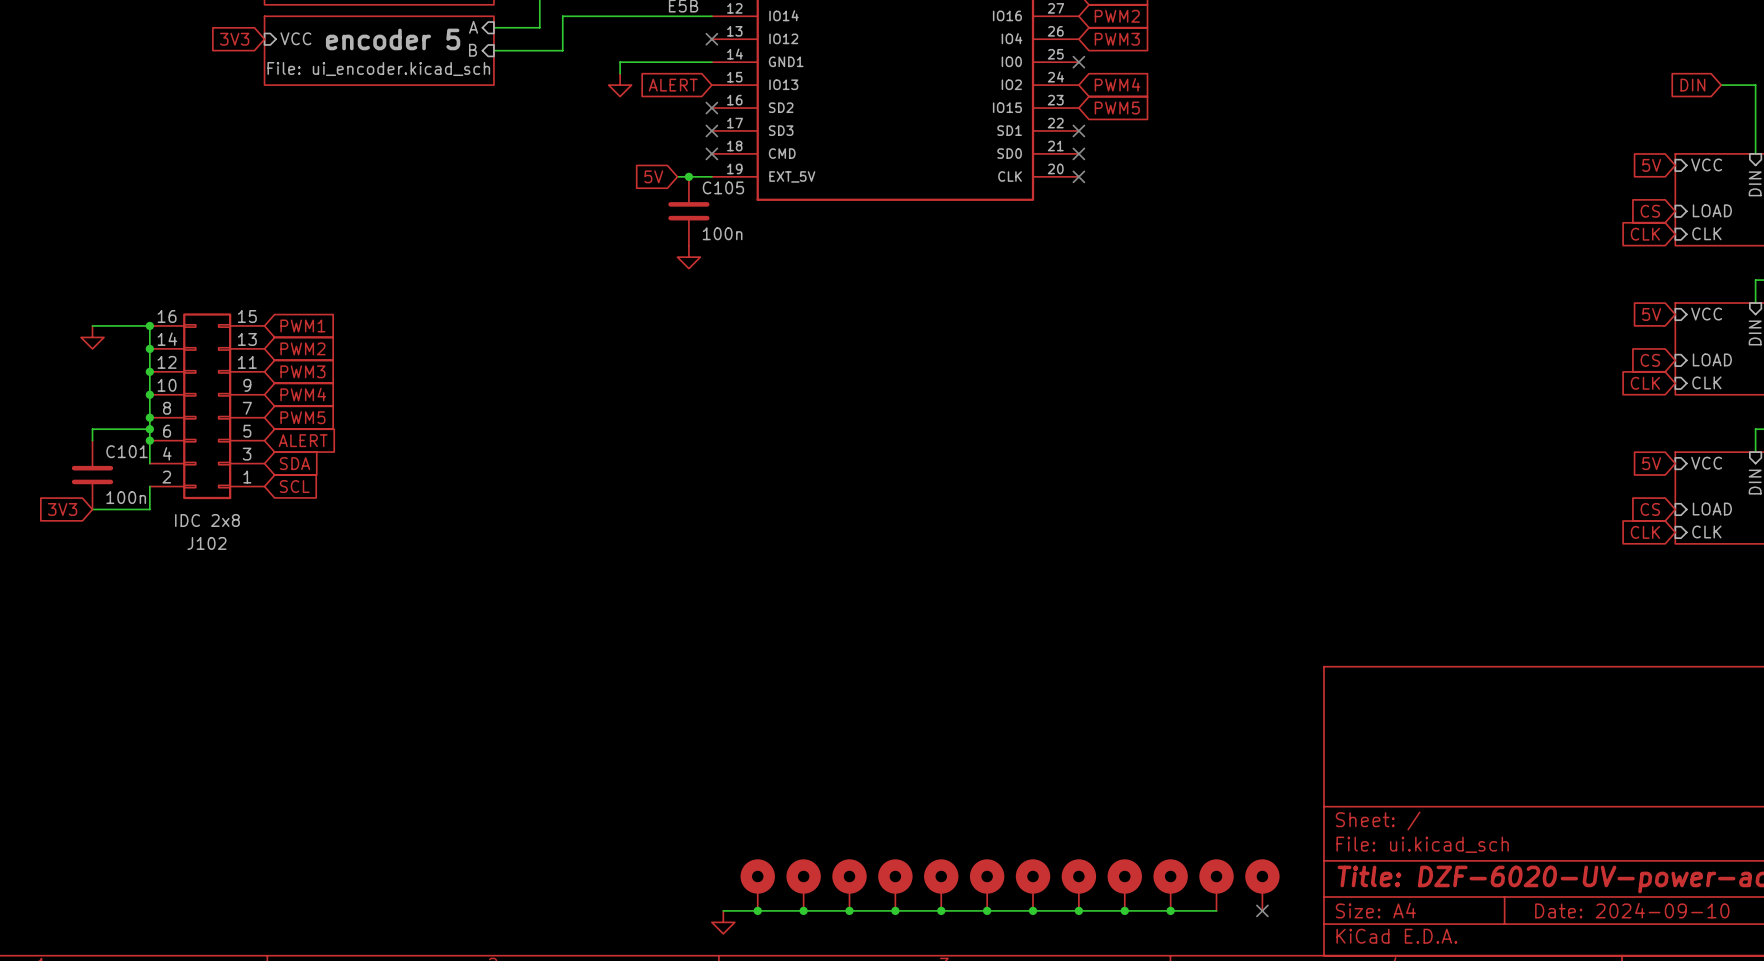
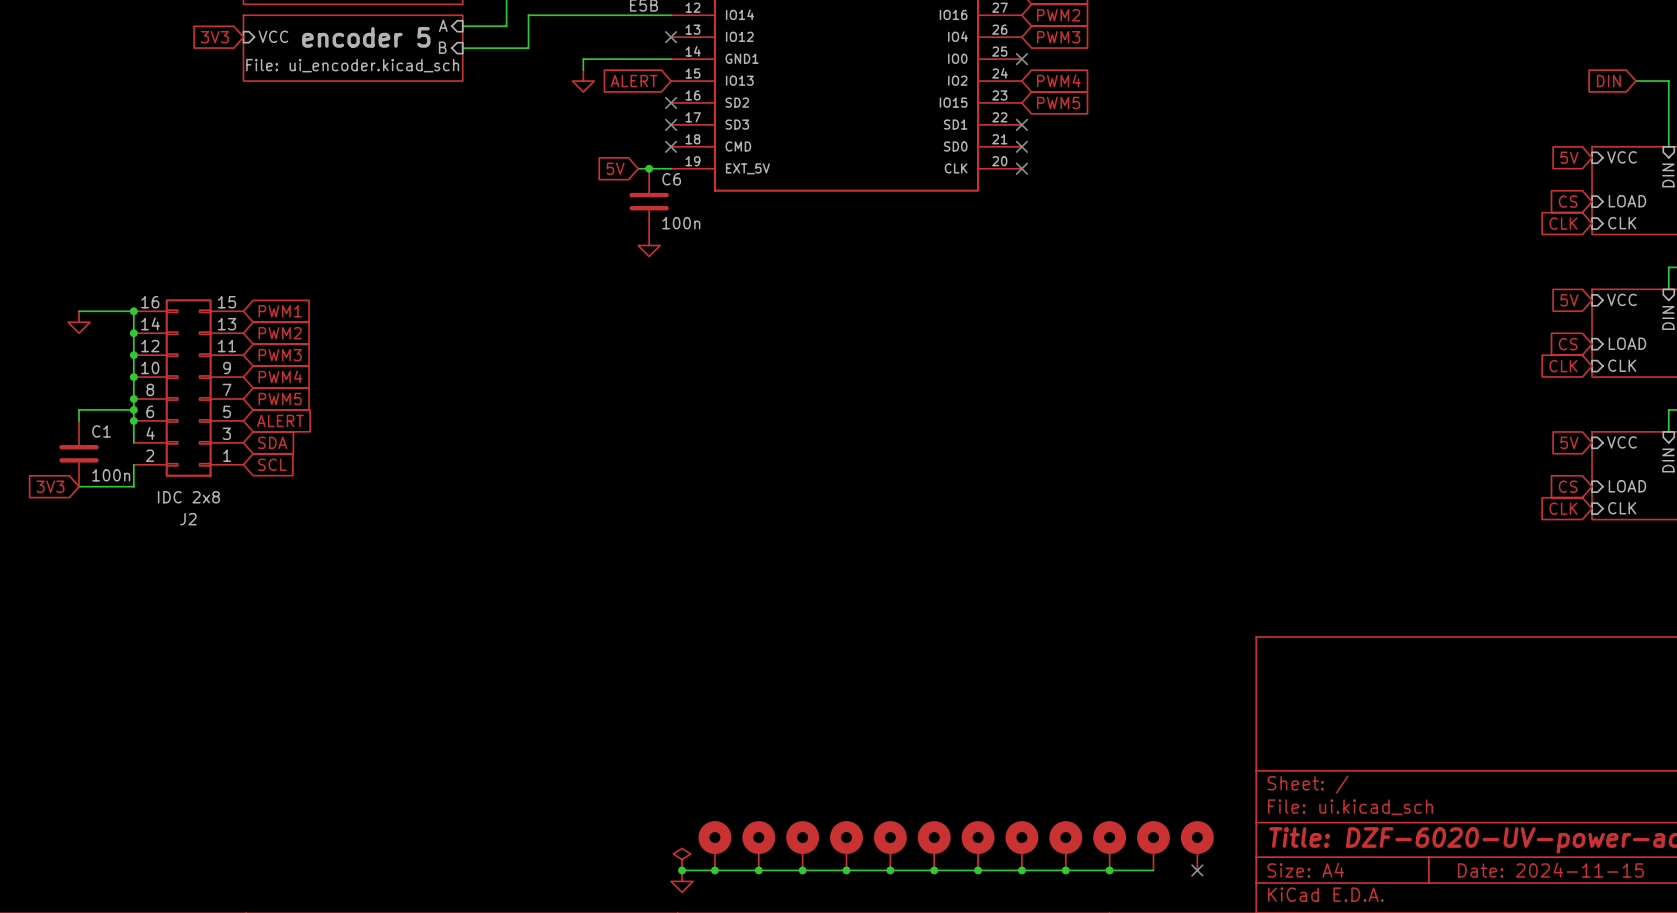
C105 name: C105 (723, 187) -> C6 (671, 179)
C101 name: C101 (127, 451) -> C1 (101, 431)
J102 name: J102 (206, 543) -> J2 (188, 519)
power symbol: none -> (682, 859)
junction: none -> (682, 870)
title block: Date: 2024-09-10 (1632, 910) -> Date: 2024-11-15 (1550, 870)

